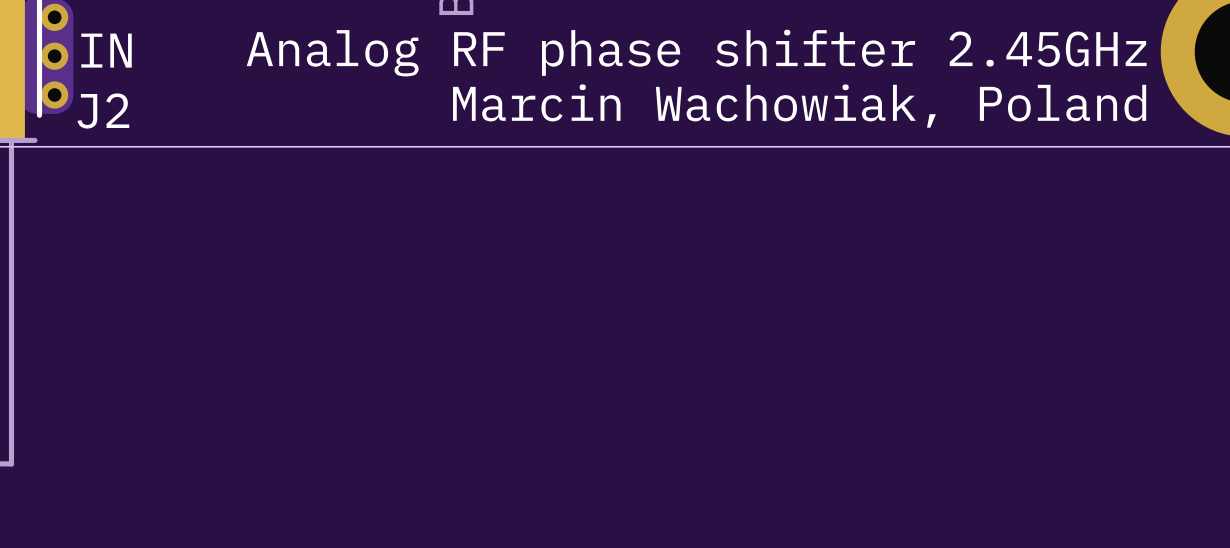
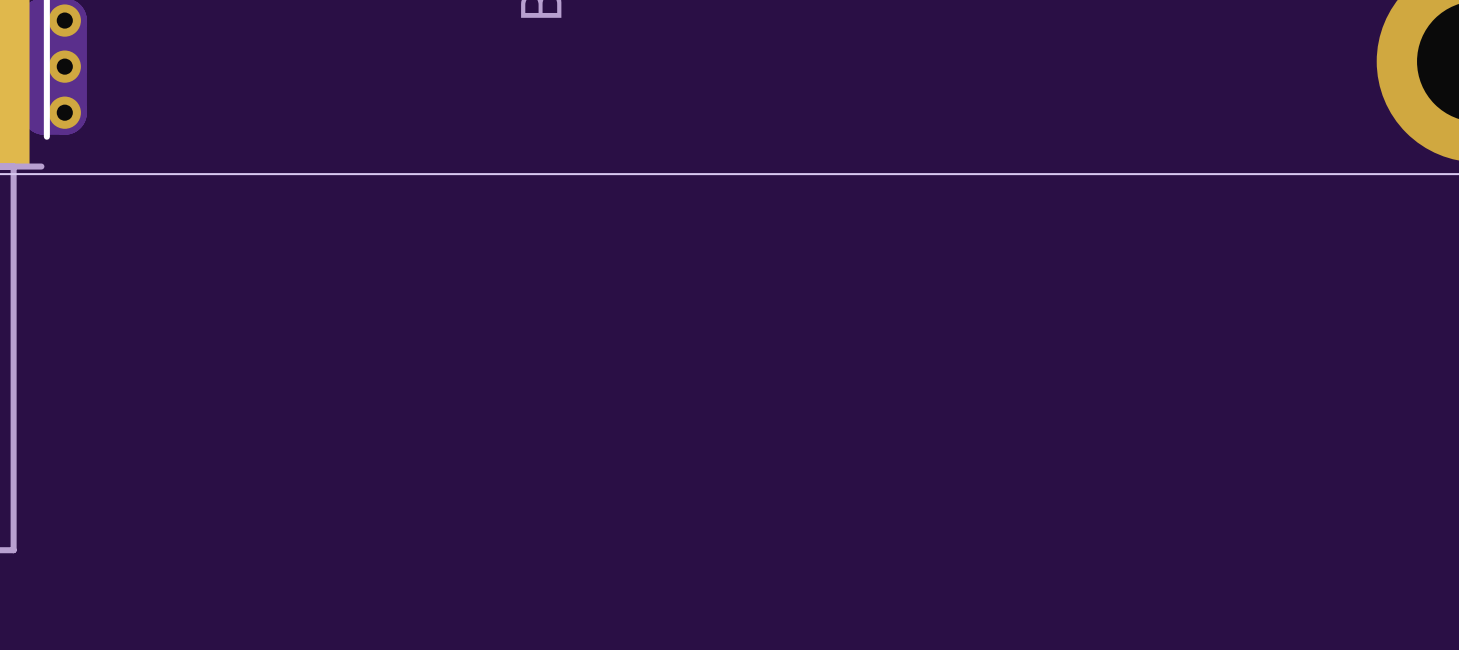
text: IN (106, 50) -> none
text: Analog RF phase shifter 2.45GHz (696, 53) -> none
text: Marcin Wachowiak, Poland (799, 106) -> none
J2 name: J2 (103, 111) -> none

